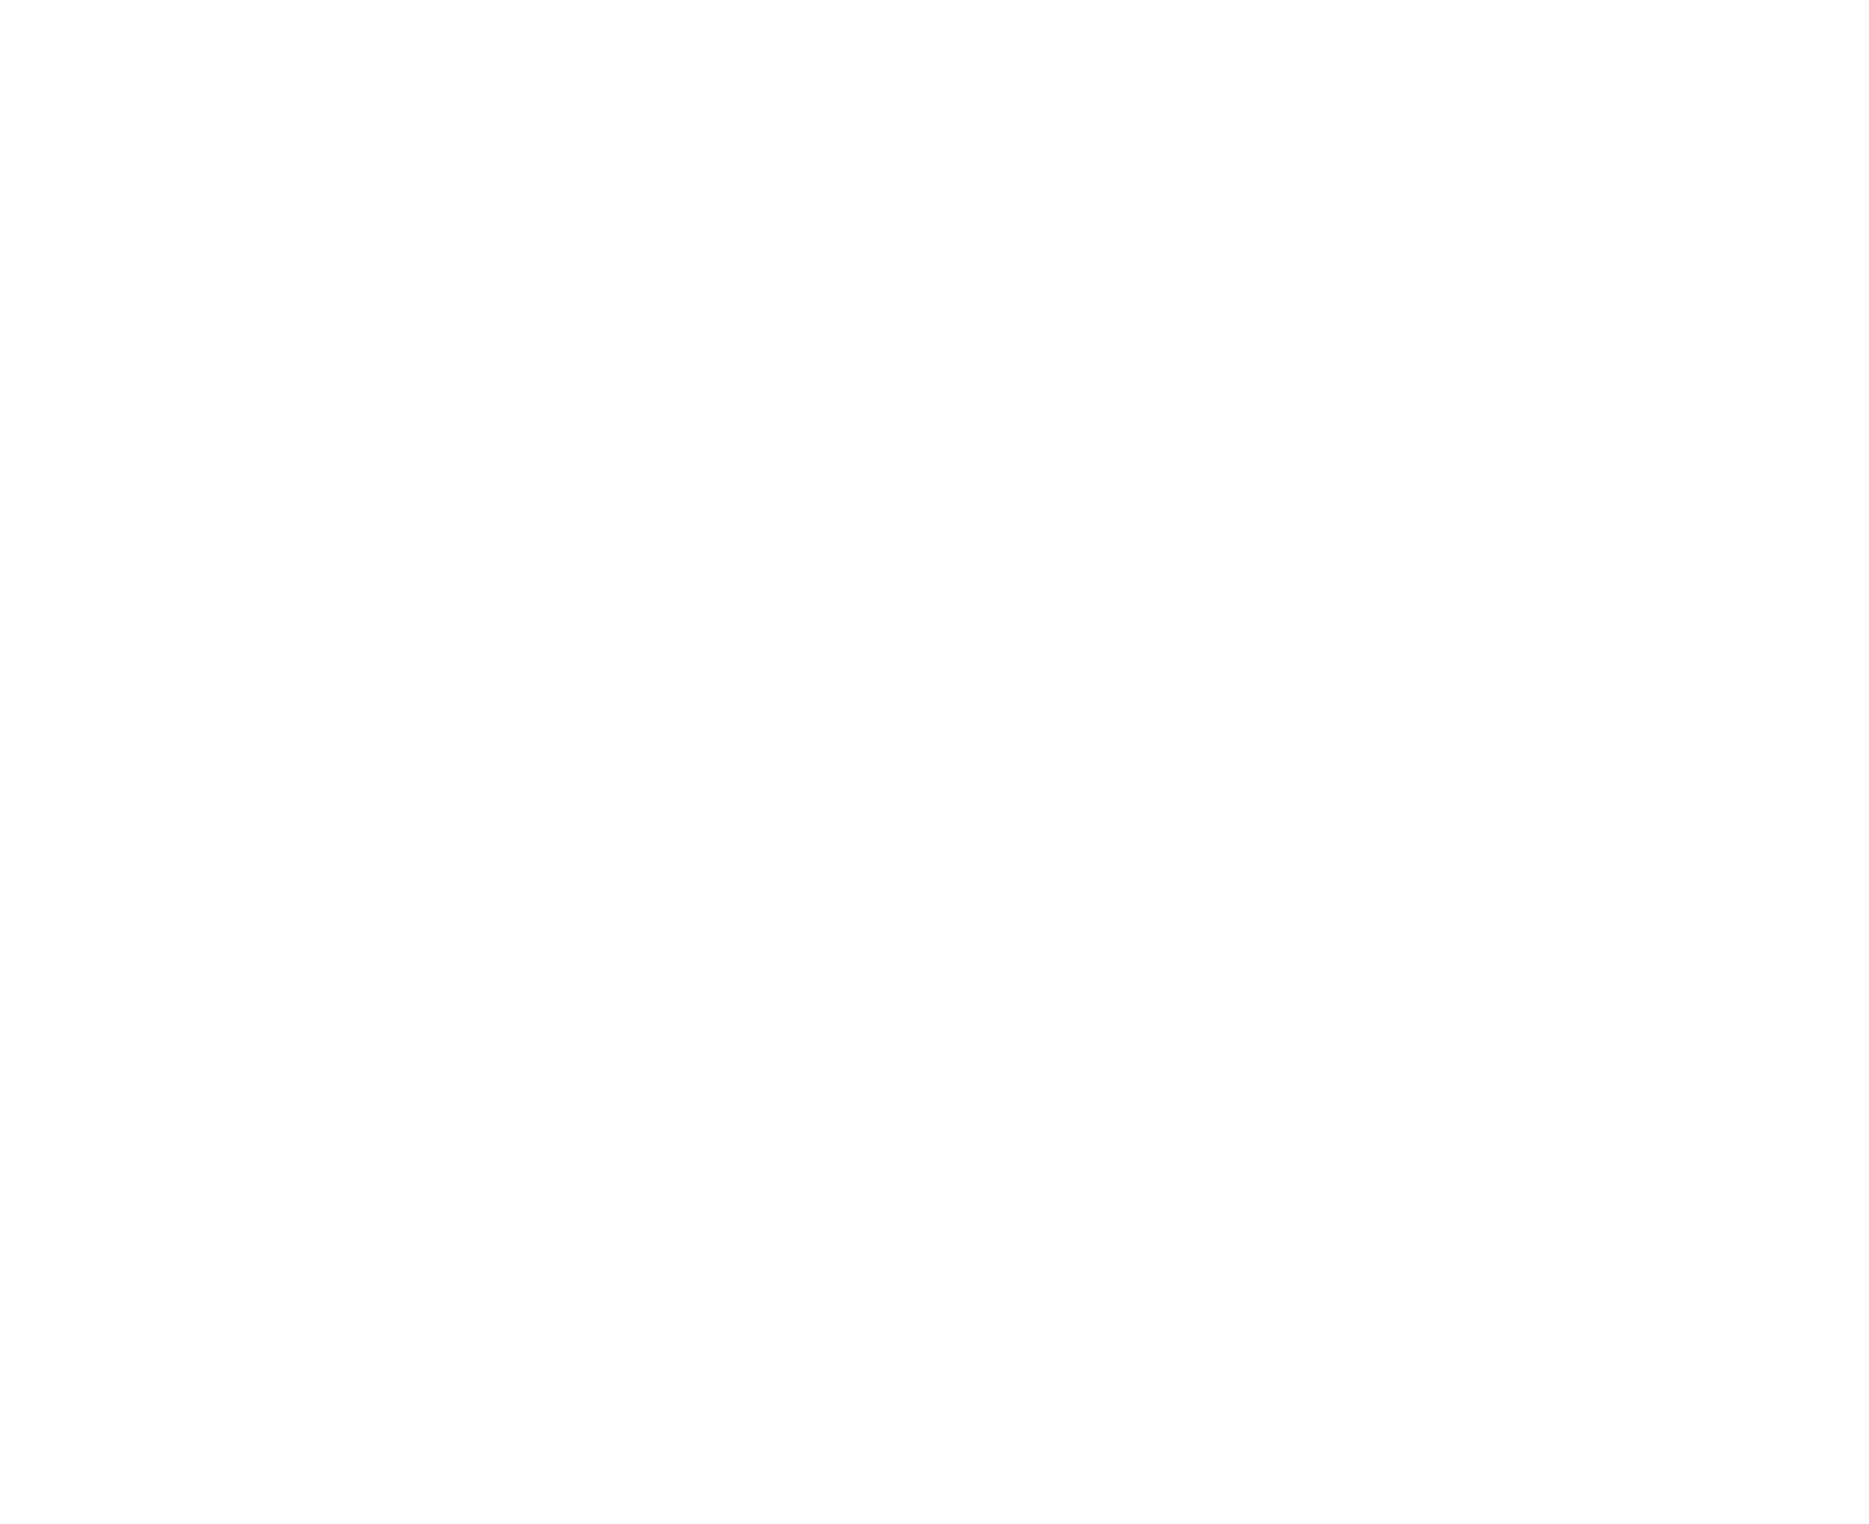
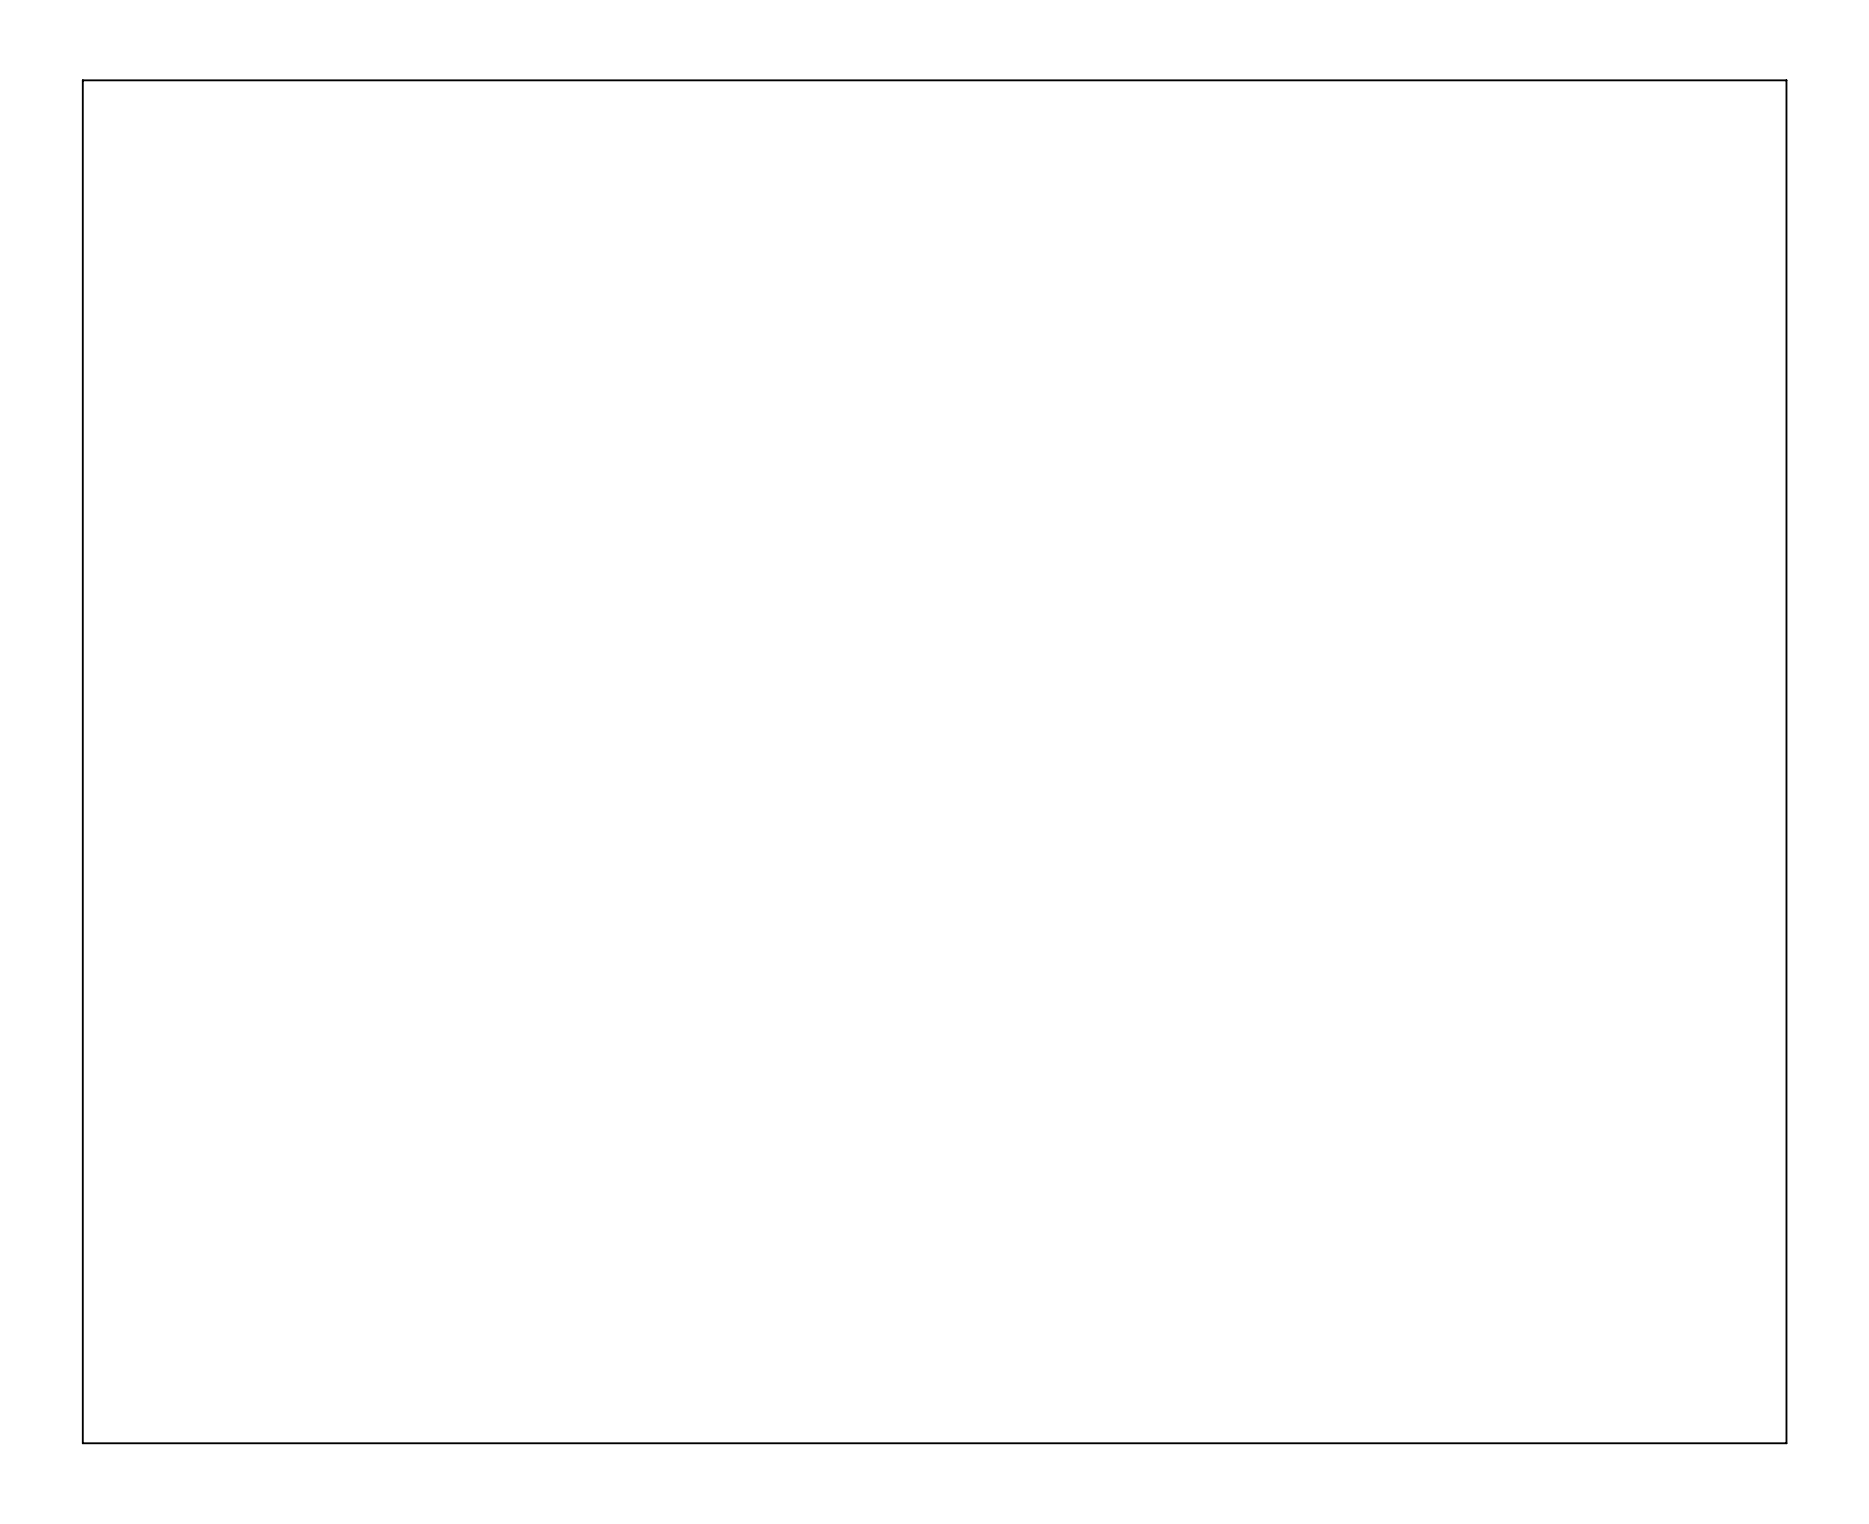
board edge: none -> (1786, 80) (82, 80) (82, 1443) (1786, 1443) (1786, 80)

